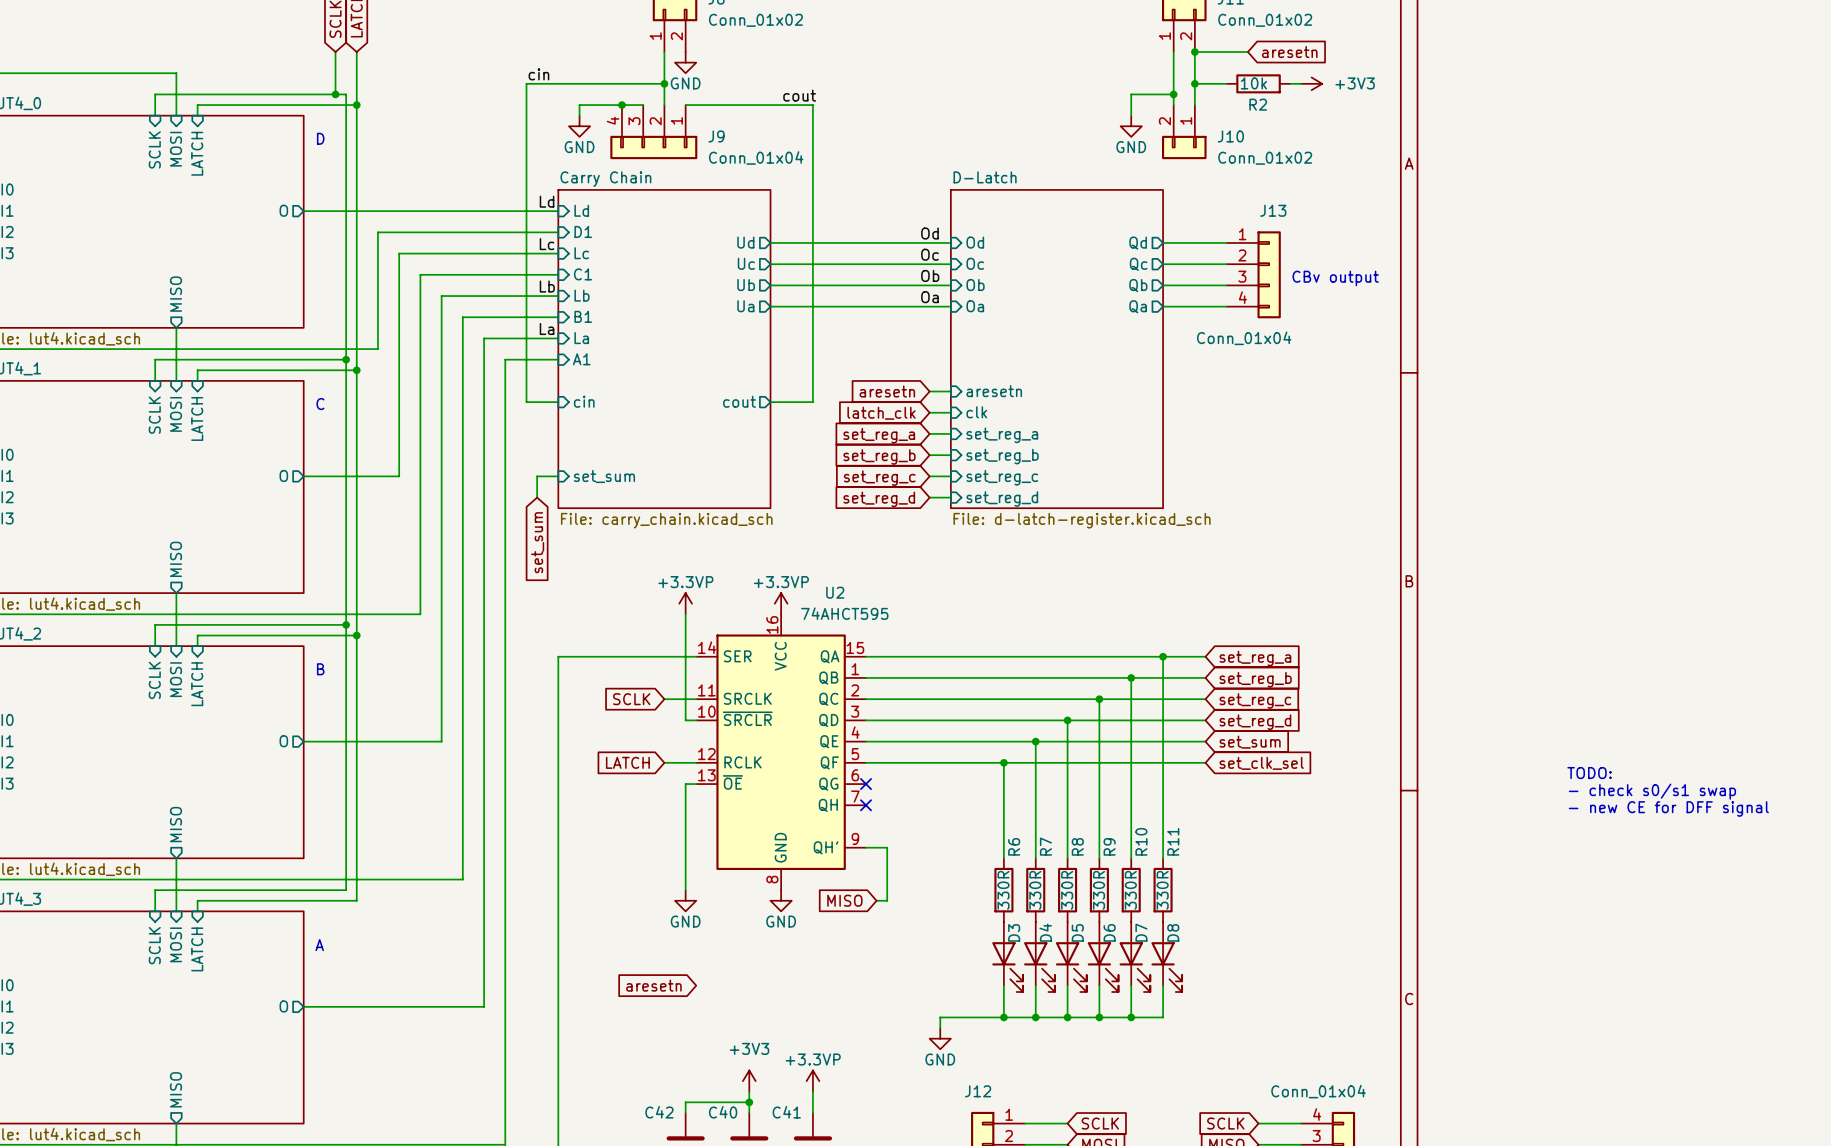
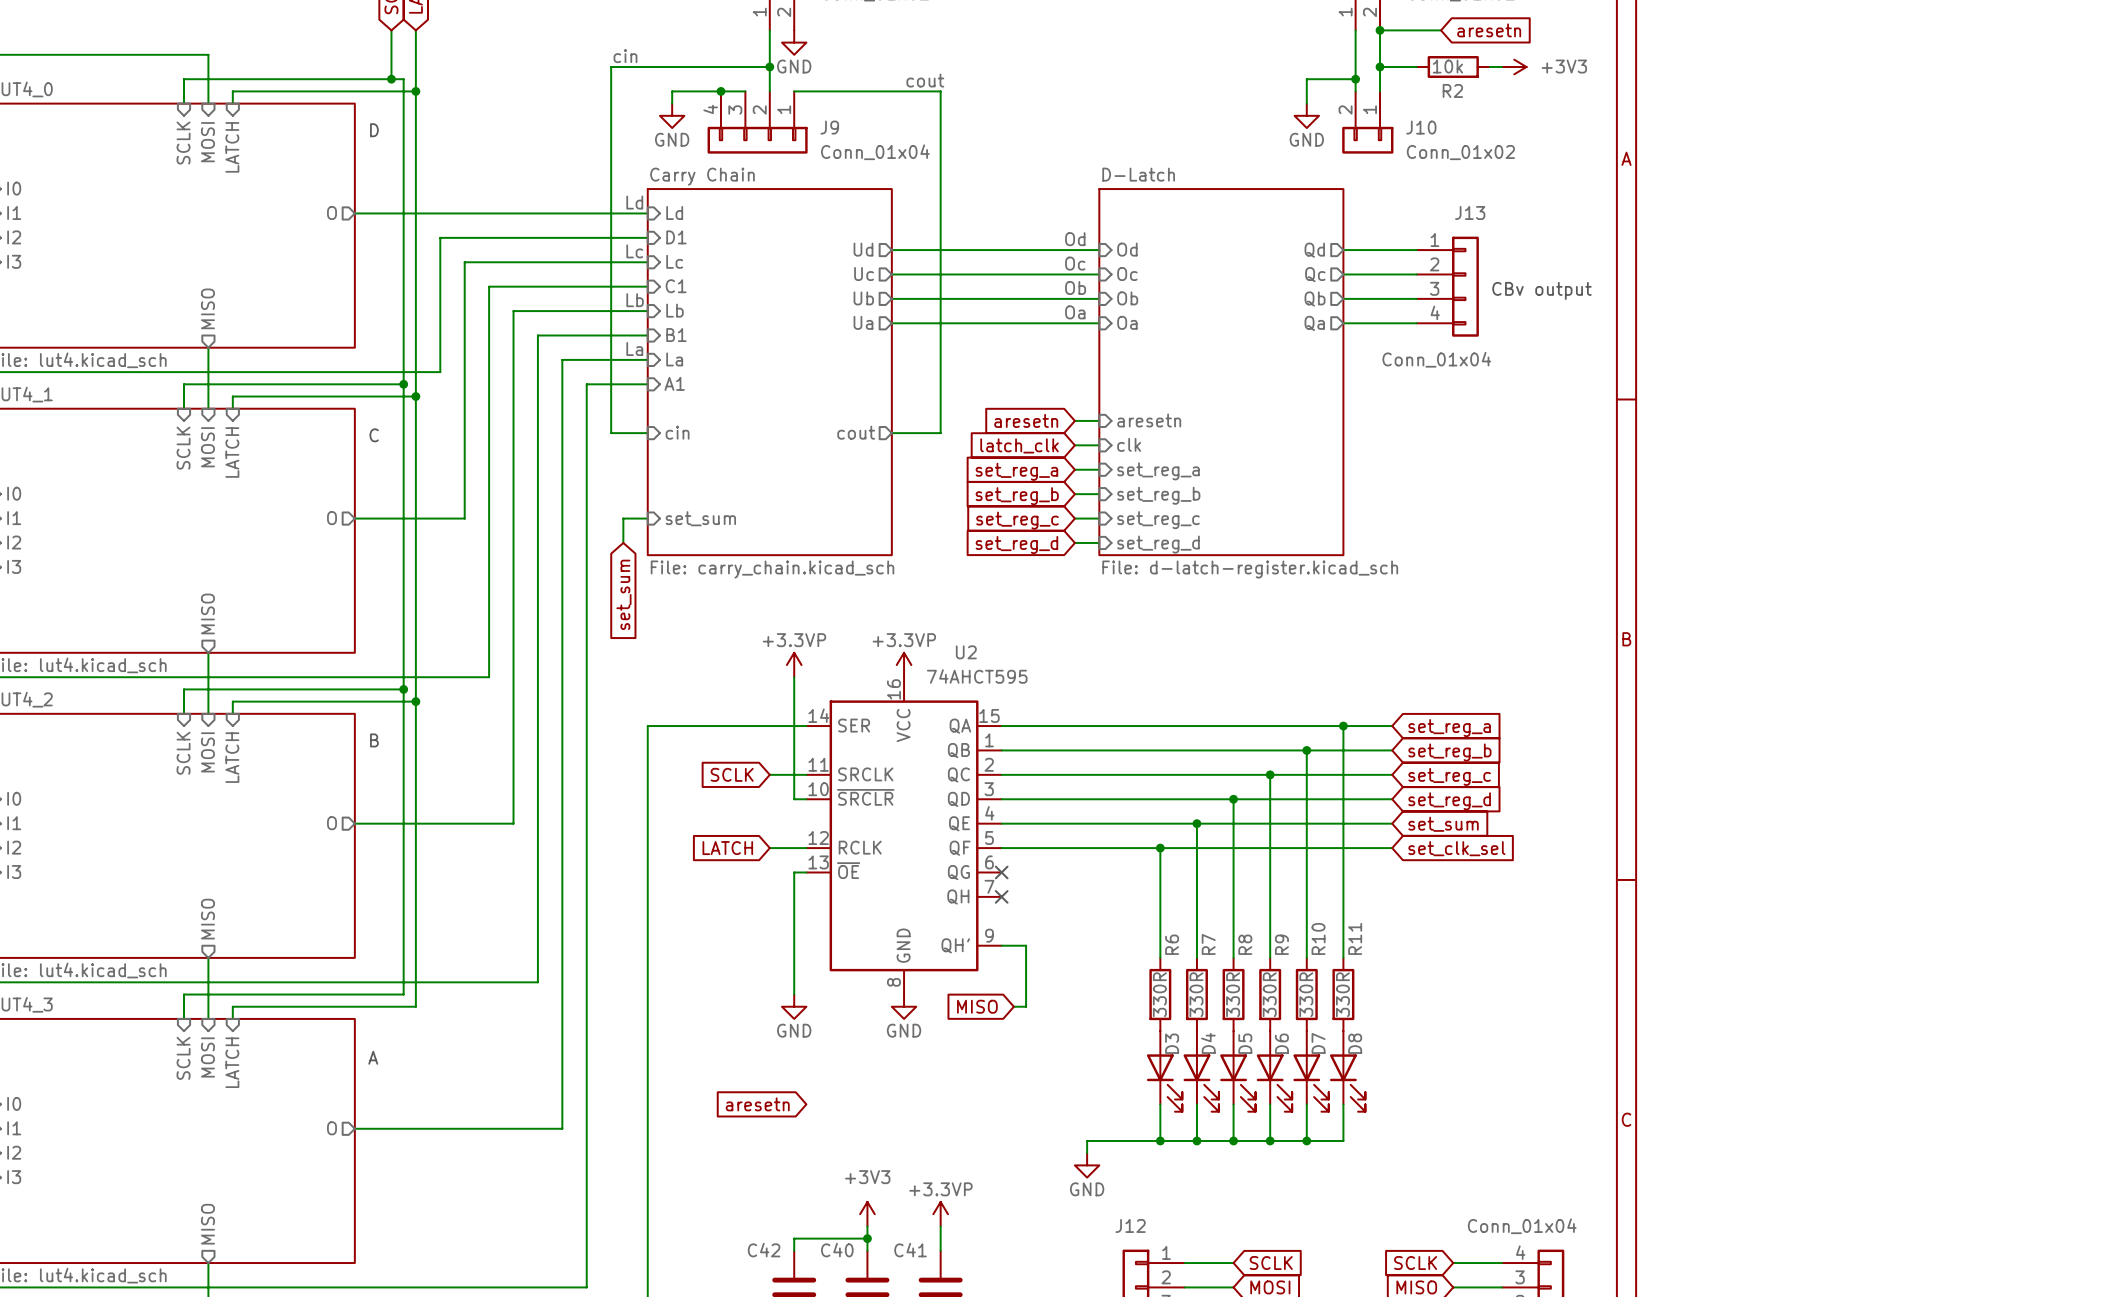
text: TODO: (1589, 773) -> none
text: - check s0/s1 swap (1652, 791) -> none
text: - new CE for DFF signal (1668, 808) -> none

